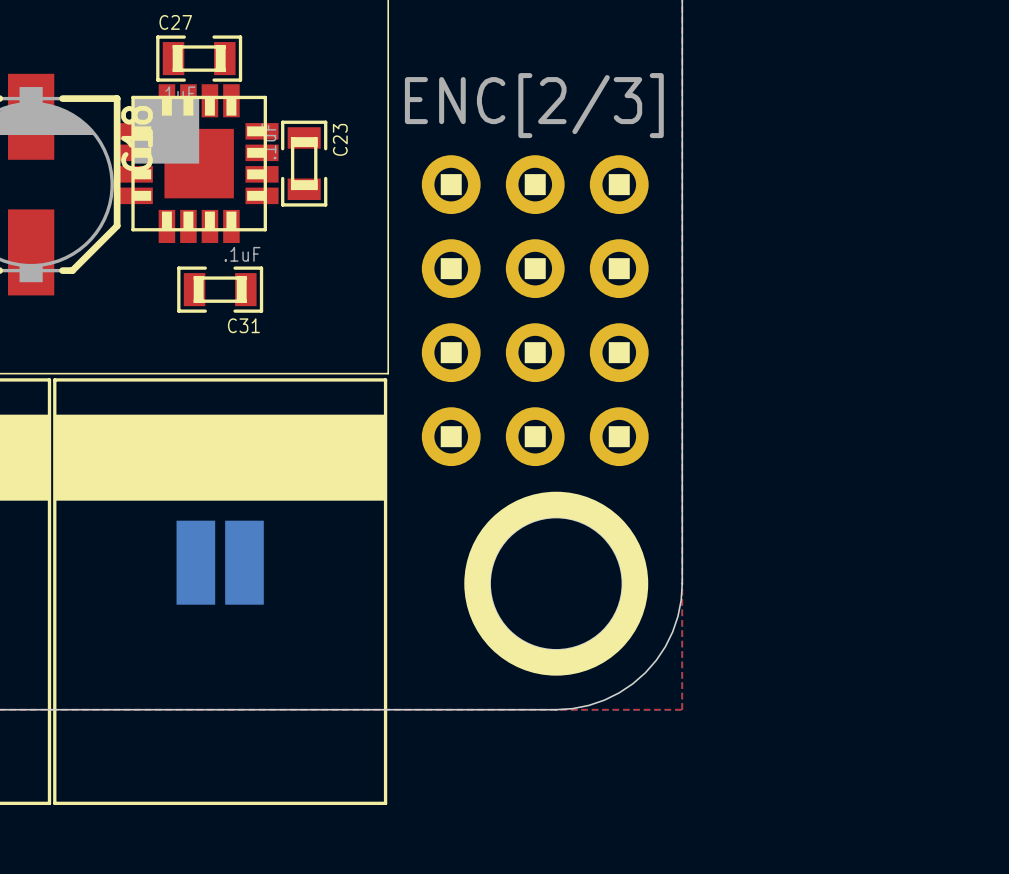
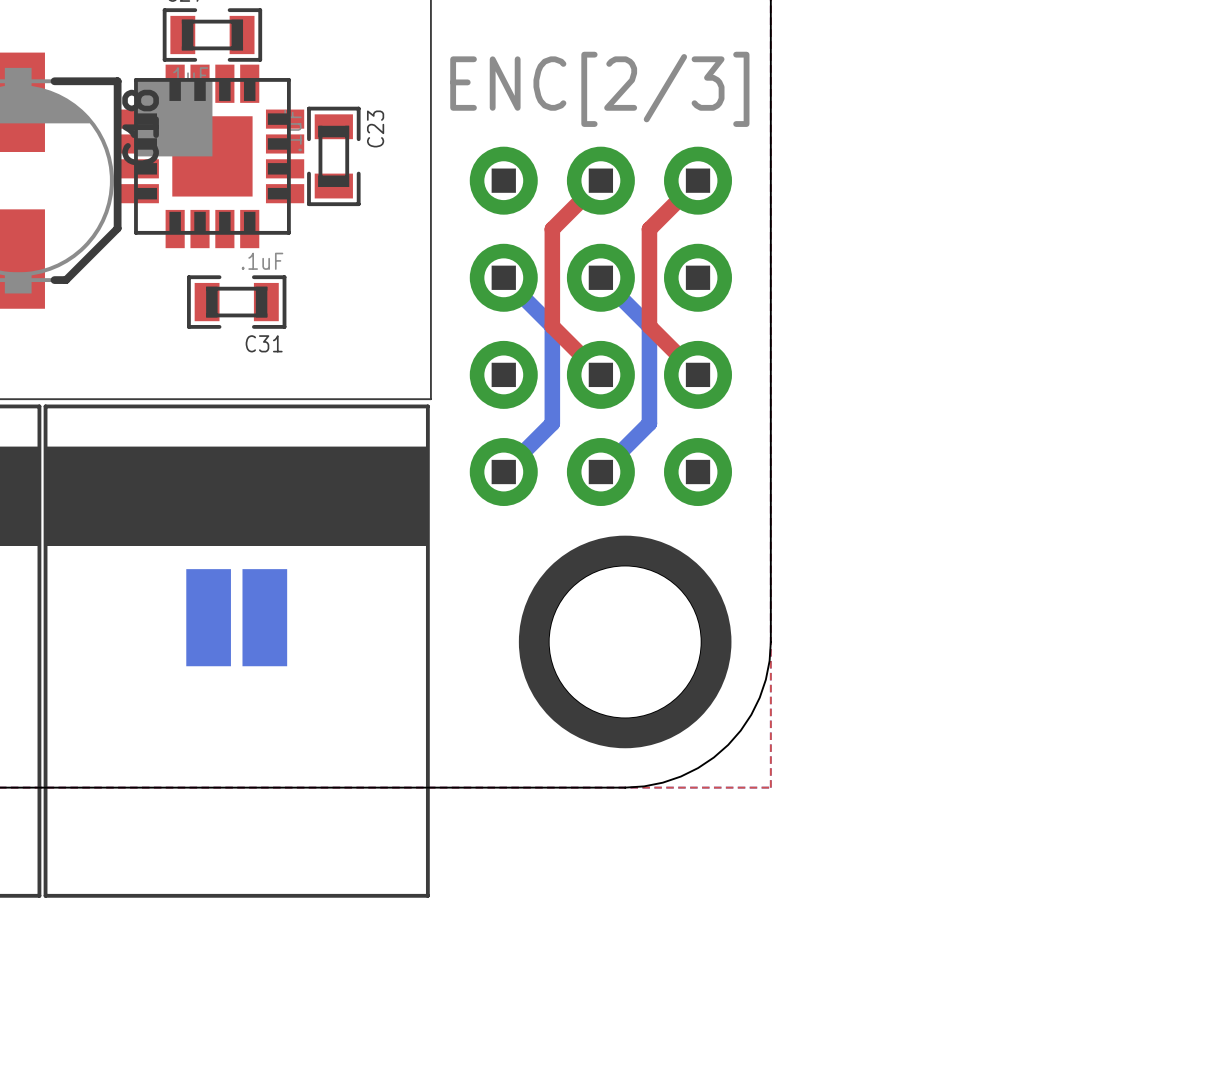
top track: none -> (600, 180) (552, 229) (552, 326) (600, 374)
top track: none -> (698, 180) (649, 229) (649, 326) (698, 374)
bottom track: none -> (503, 277) (552, 326) (552, 423) (503, 472)
bottom track: none -> (600, 277) (649, 326) (649, 423) (600, 472)

